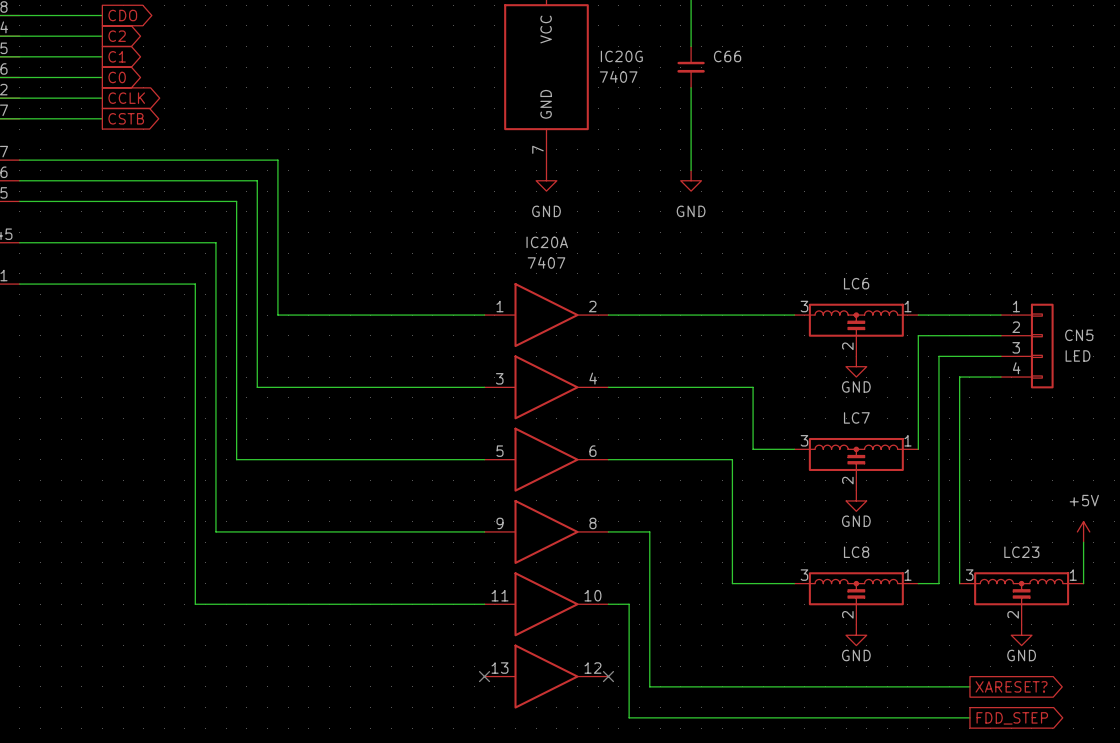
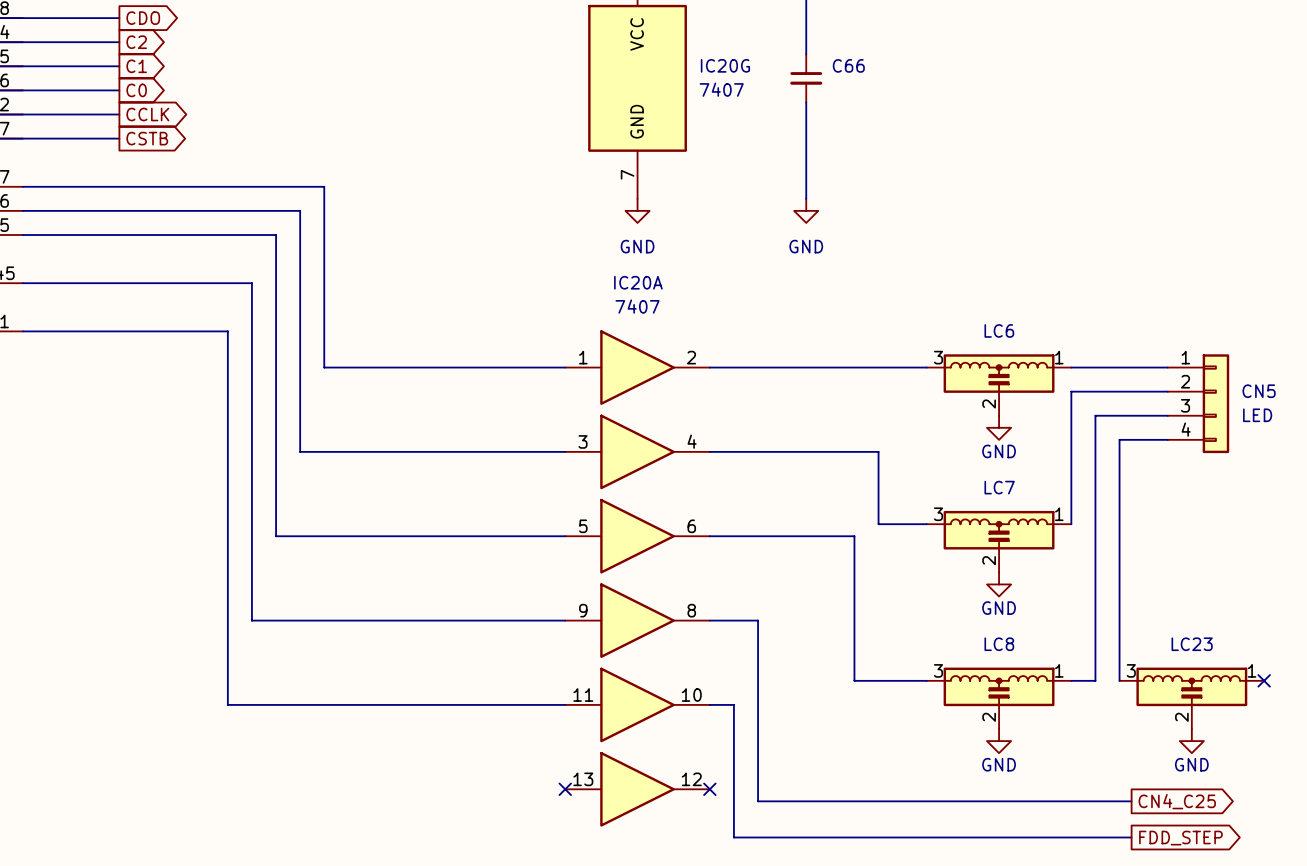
power symbol: +5V (1083, 531) -> none
wire: (1083, 542) (1083, 583) -> none
no-connect mark: none -> (1264, 680)
global label: XARESET? (1011, 686) -> CN4_C25 (1177, 801)

